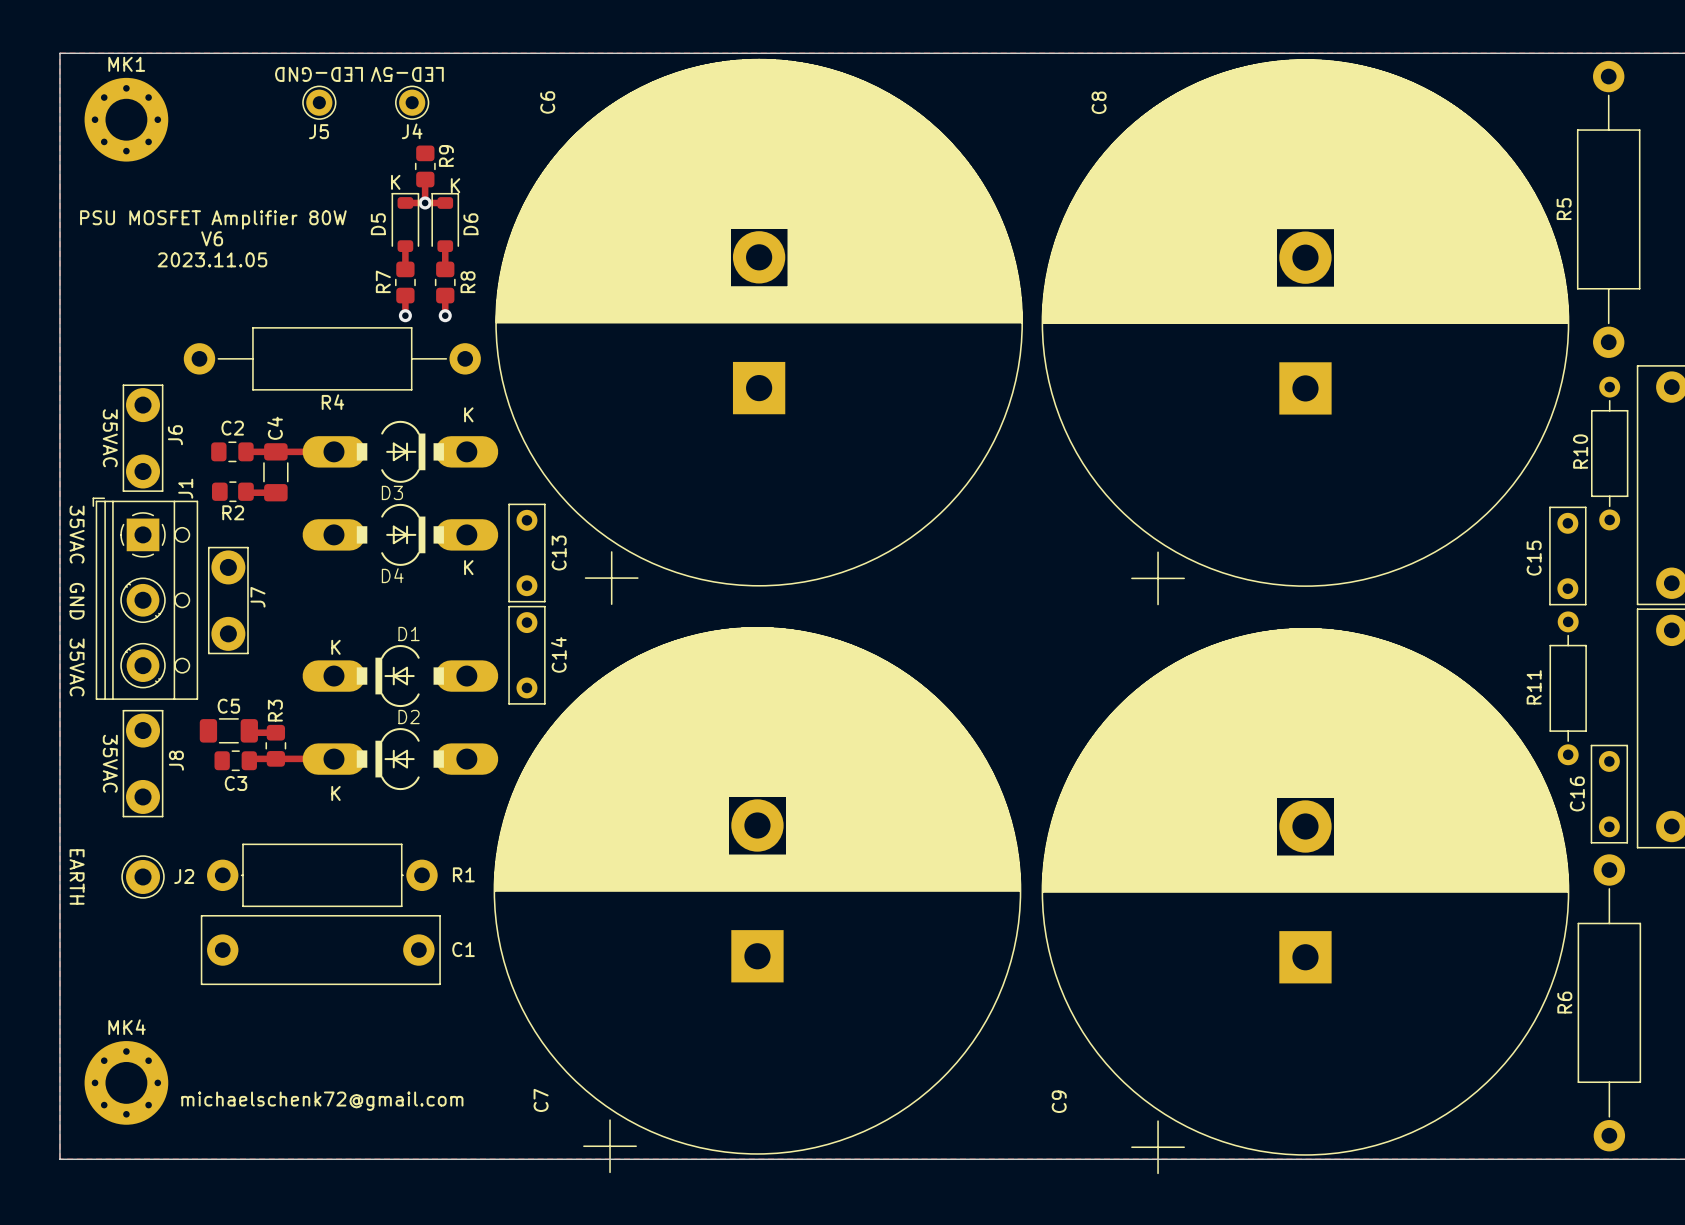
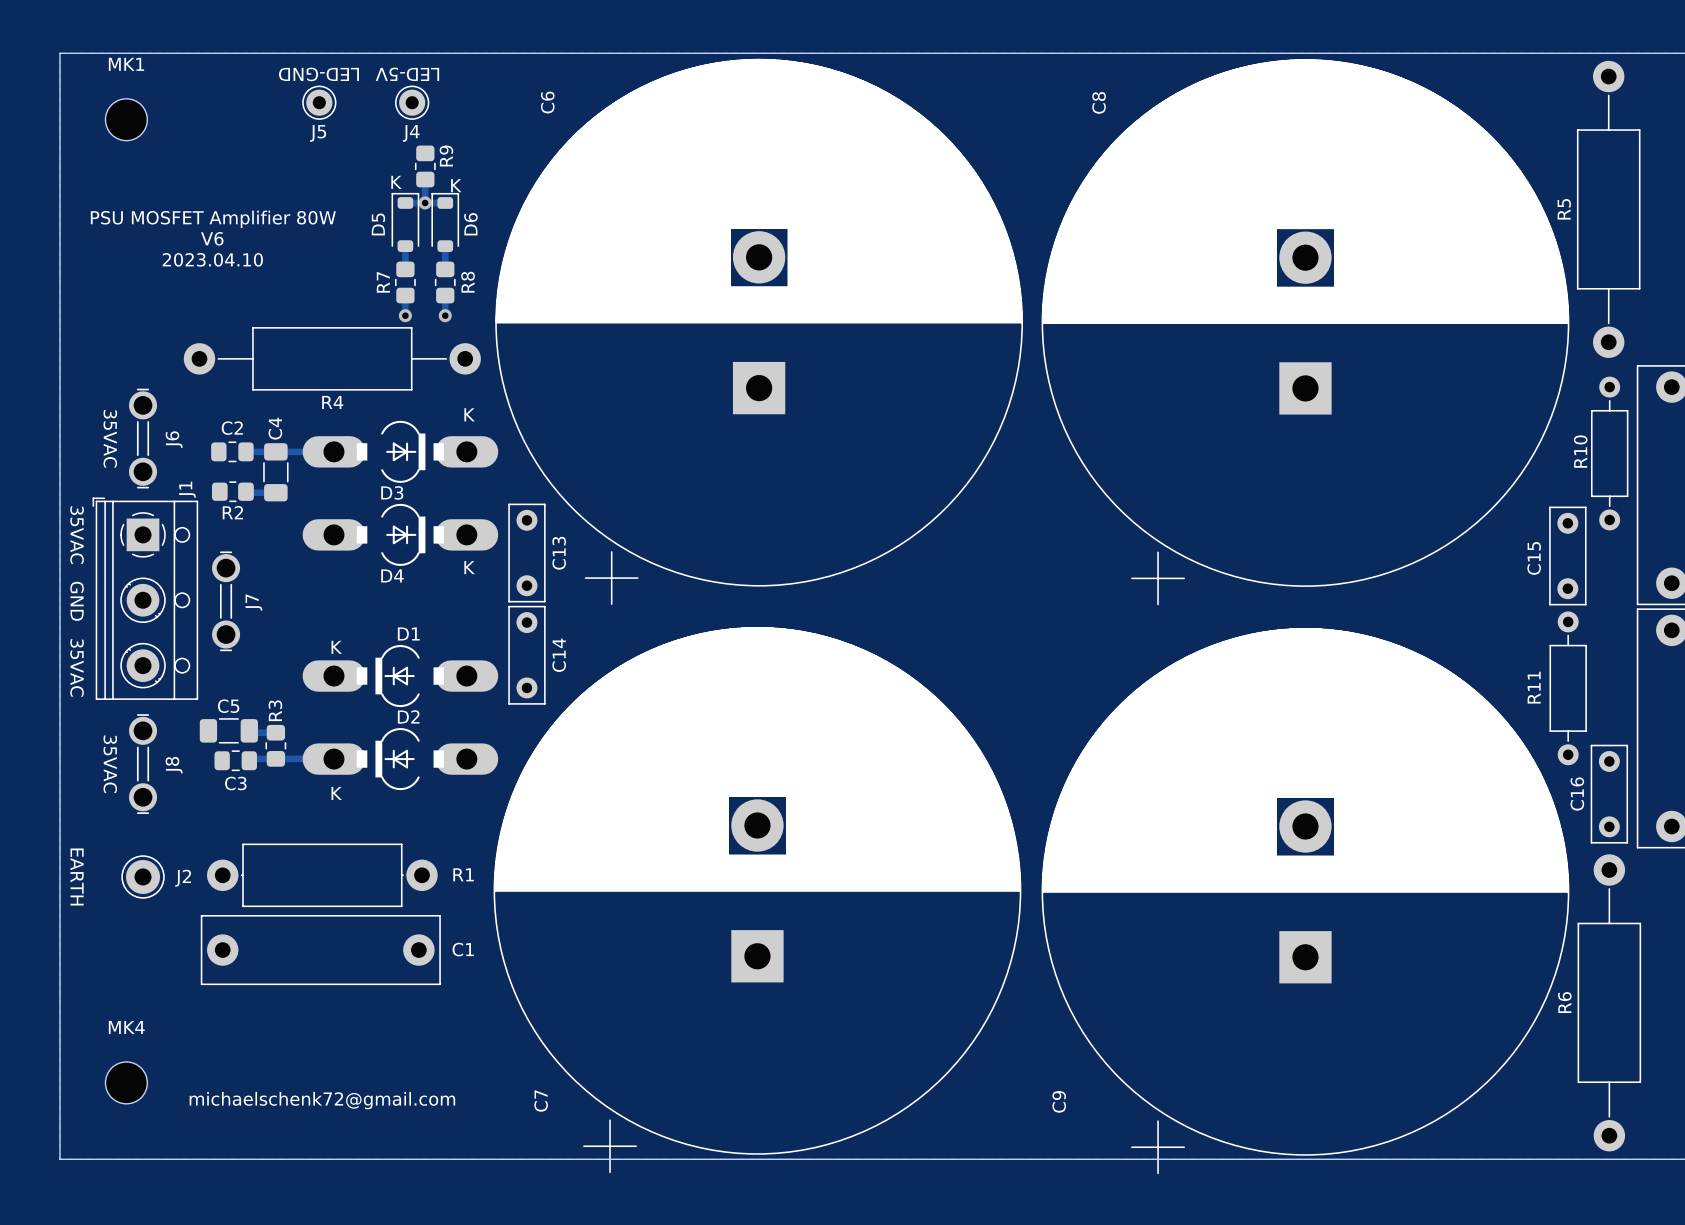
MK1 footprint: [84, 77, 169, 162] -> [105, 98, 148, 141]
text: 2023.11.05 (212, 259) -> 2023.04.10 (212, 259)
J6 footprint: [122, 384, 164, 492] -> [128, 388, 158, 489]
J7 footprint: [207, 546, 249, 655] -> [212, 551, 241, 652]
J8 footprint: [122, 709, 164, 818] -> [128, 714, 158, 814]
MK4 footprint: [84, 1041, 169, 1125] -> [105, 1061, 148, 1104]

